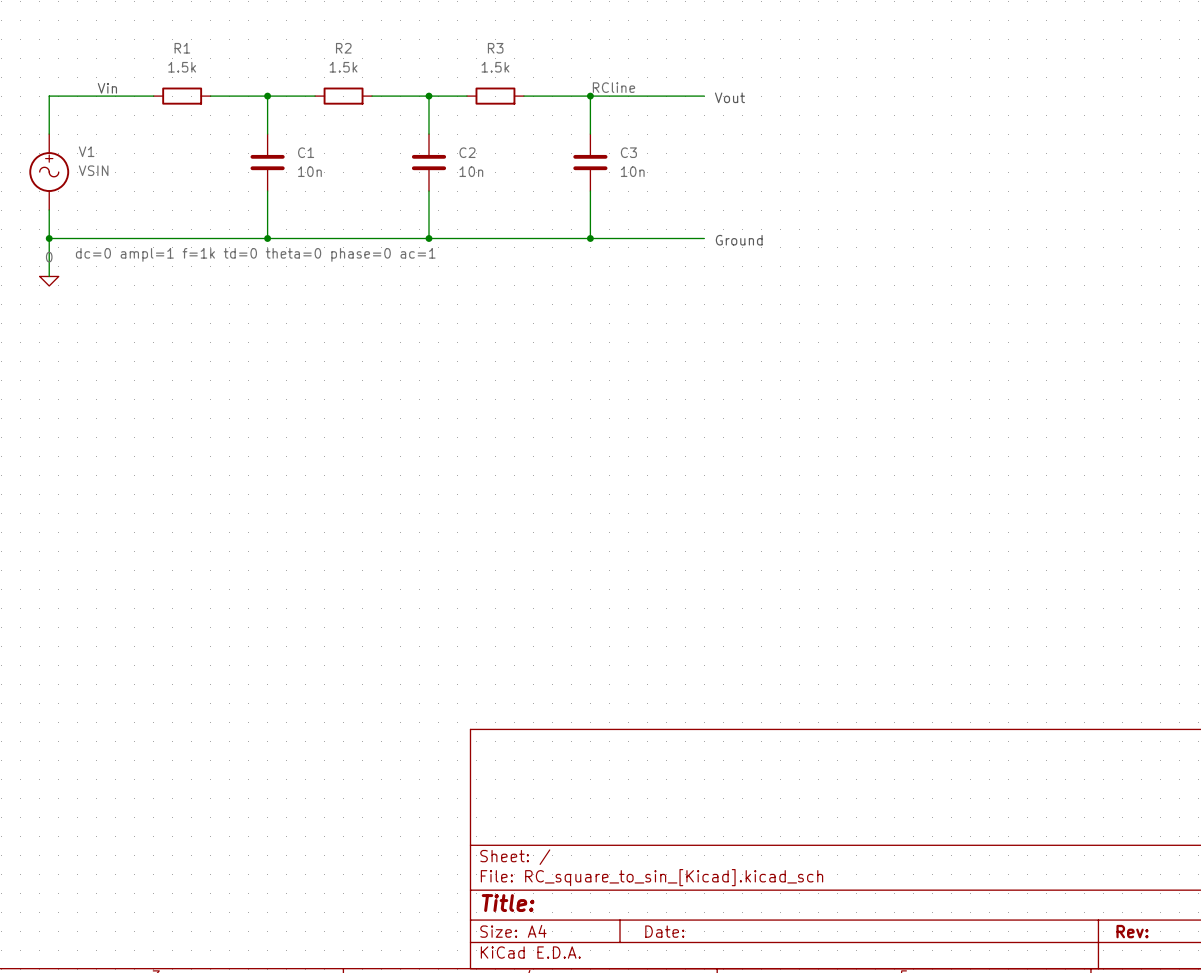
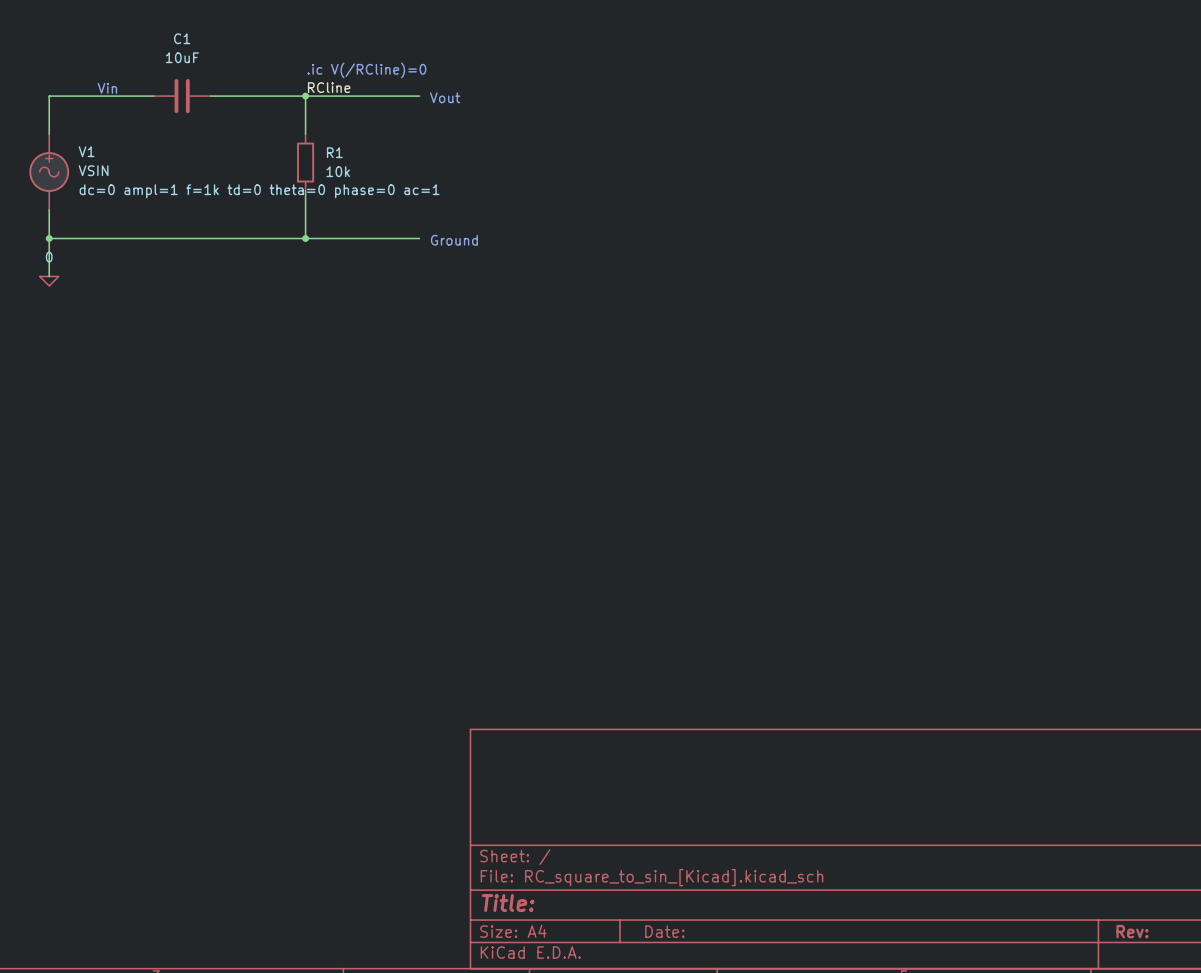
R1 name position: R1 (182, 48) -> R1 (334, 152)
R1 value: 1.5k (182, 67) -> 10k (338, 171)
text: none -> .ic V(/RCline)=0 (366, 70)
label: none -> RCline (329, 87)
label: RCline (613, 87) -> none
R1 rotation: 0° (182, 96) -> 90° clockwise (305, 162)
R1 position: (182, 96) -> (305, 162)
wire: (267, 96) (267, 134) -> (305, 96) (305, 134)
junction position: (267, 96) -> (305, 96)
wire: none -> (315, 96) (372, 96)
R2: 1.5k (343, 96) -> none
wire: (419, 96) (466, 96) -> none
wire: (429, 96) (429, 134) -> none
junction: (429, 96) -> none
R3: 1.5k (495, 96) -> none
wire: (523, 96) (704, 96) -> none
wire: (590, 96) (590, 134) -> none
junction: (590, 96) -> none
text: none -> Vout (445, 97)
text: Vout (729, 97) -> none
C1 name position: C1 (306, 152) -> C1 (182, 38)
C1 rotation: 0° (267, 162) -> 90° clockwise (182, 96)
C1 position: (267, 162) -> (182, 96)
C2: 10n (429, 162) -> none
C3: 10n (590, 162) -> none
C1 value: 10n (309, 171) -> 10uF (182, 57)
wire: (267, 191) (267, 238) -> (305, 191) (305, 238)
wire: (429, 191) (429, 238) -> none
wire: (590, 191) (590, 238) -> none
junction position: (267, 238) -> (305, 238)
wire: (419, 238) (704, 238) -> none
junction: (429, 238) -> none
junction: (590, 238) -> none
text: none -> Ground (454, 240)
text: Ground (739, 240) -> none
V1 text position: dc=0 ampl=1 f=1k td=0 theta=0 phase=0 ac=1 (255, 254) -> dc=0 ampl=1 f=1k td=0 theta=0 phase=0 ac=1 (259, 191)

